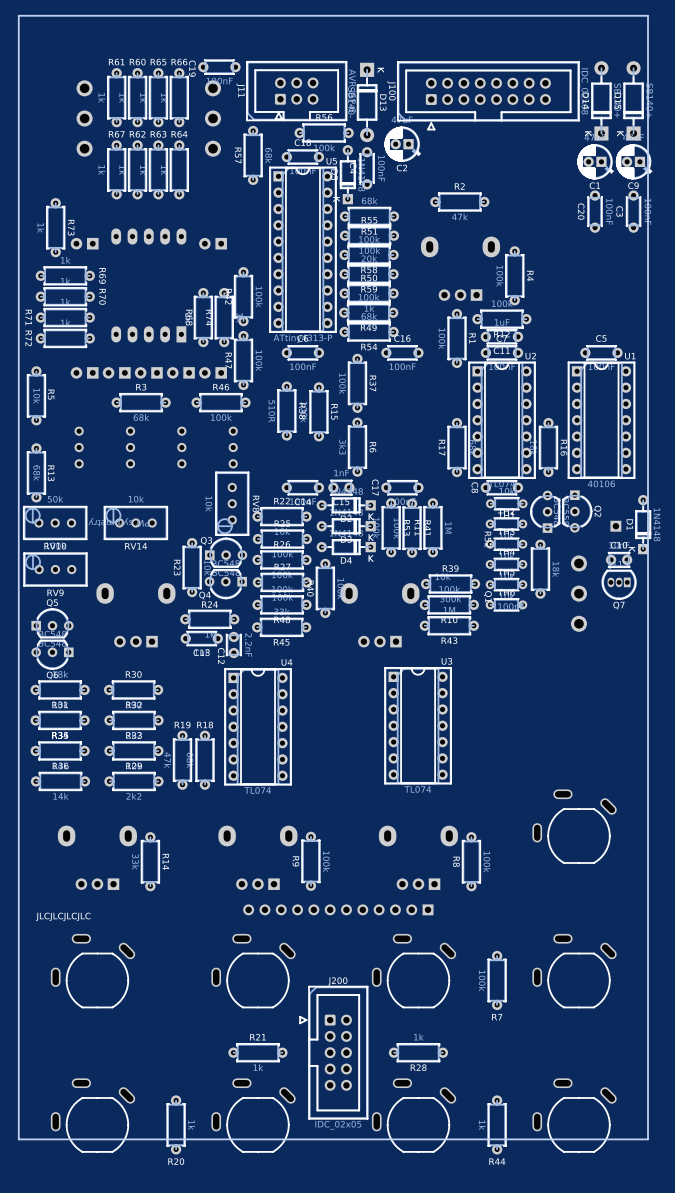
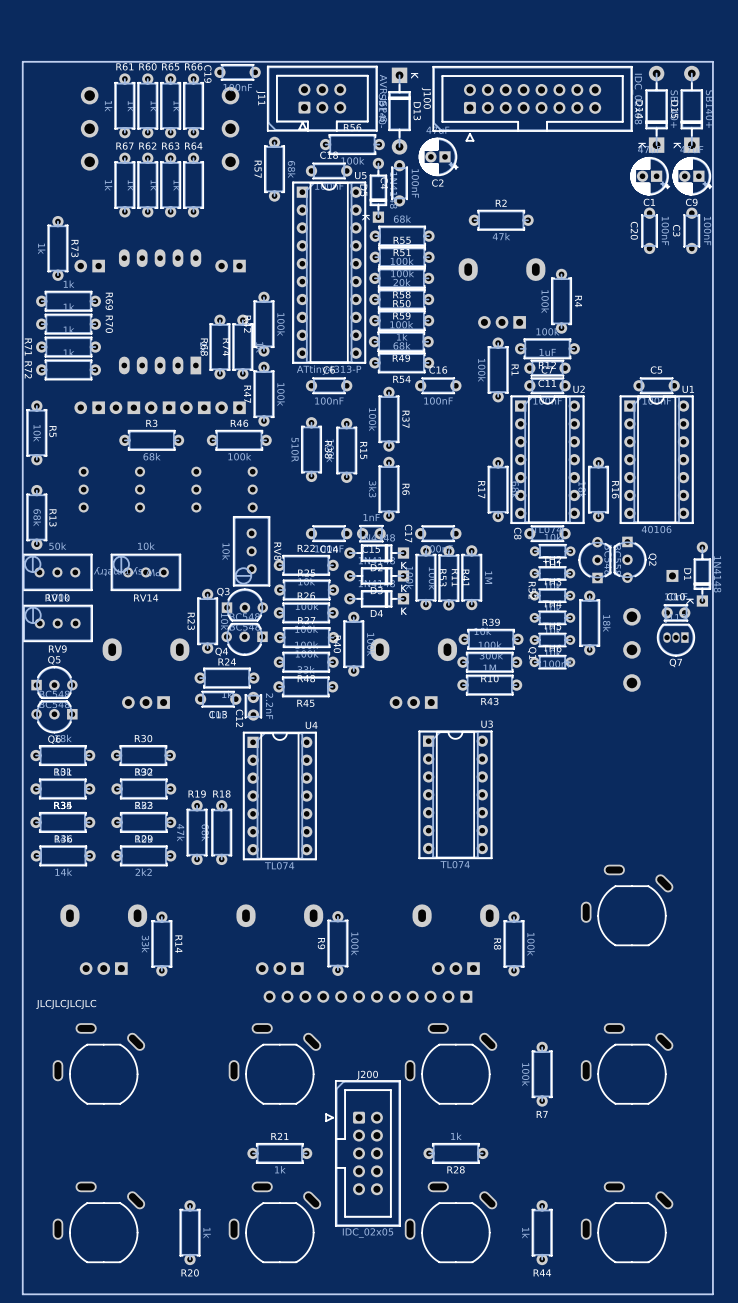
board edge: (648, 15) (18, 15) (18, 1139) (648, 1139) (648, 15) -> (712, 61) (22, 61) (22, 1294) (712, 1294) (712, 61)

